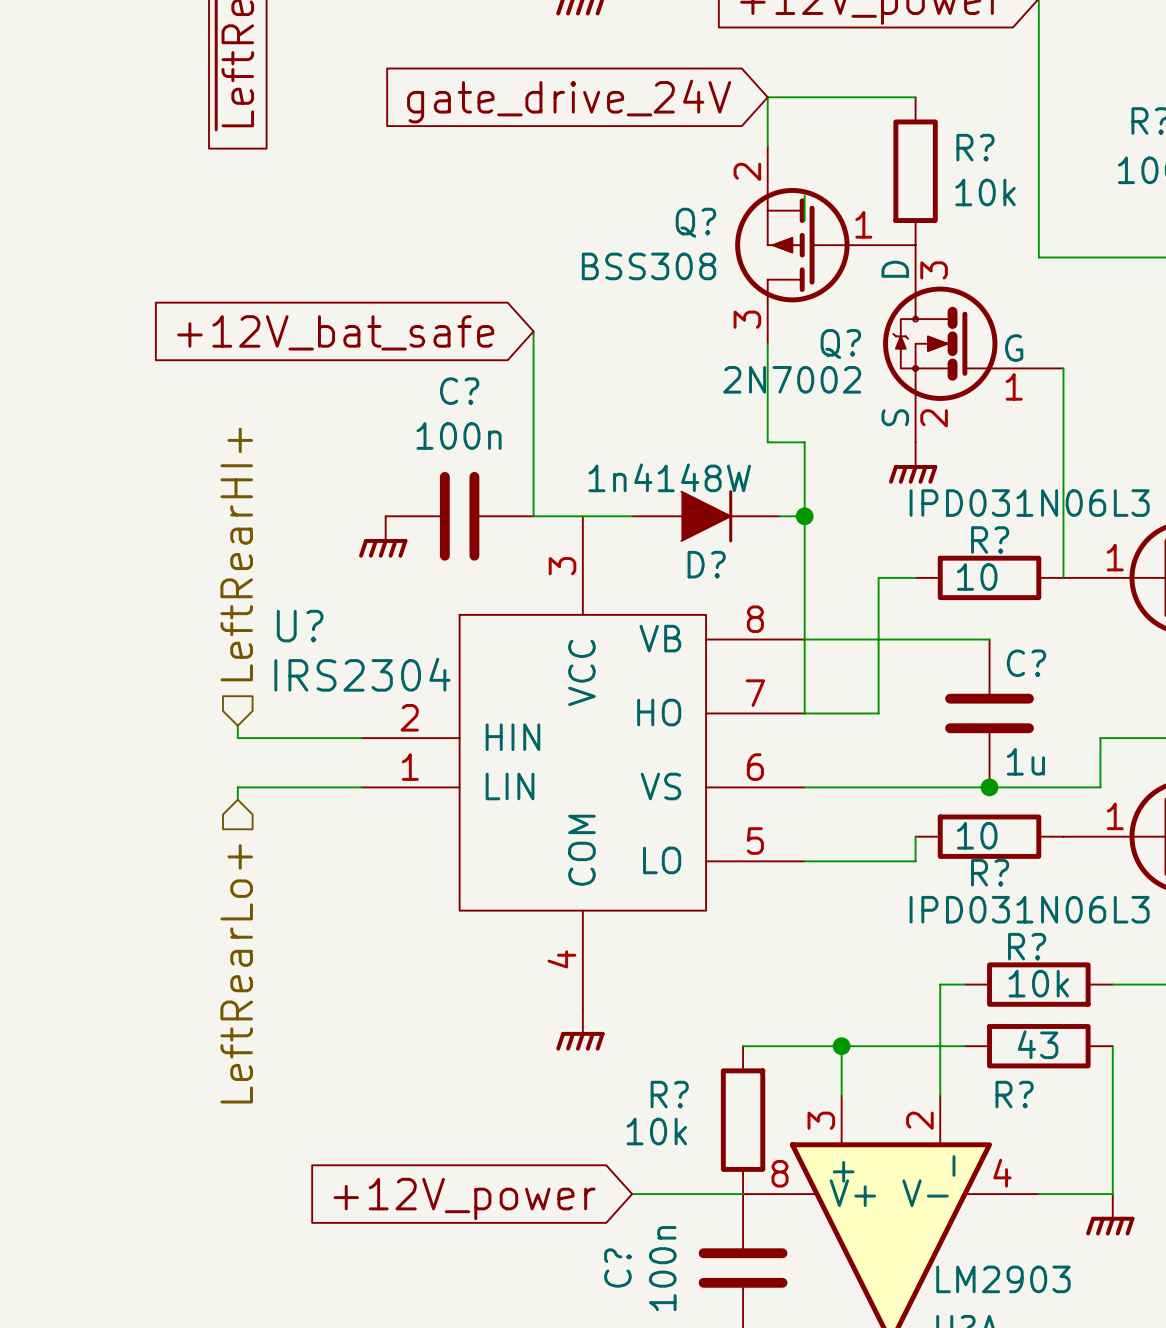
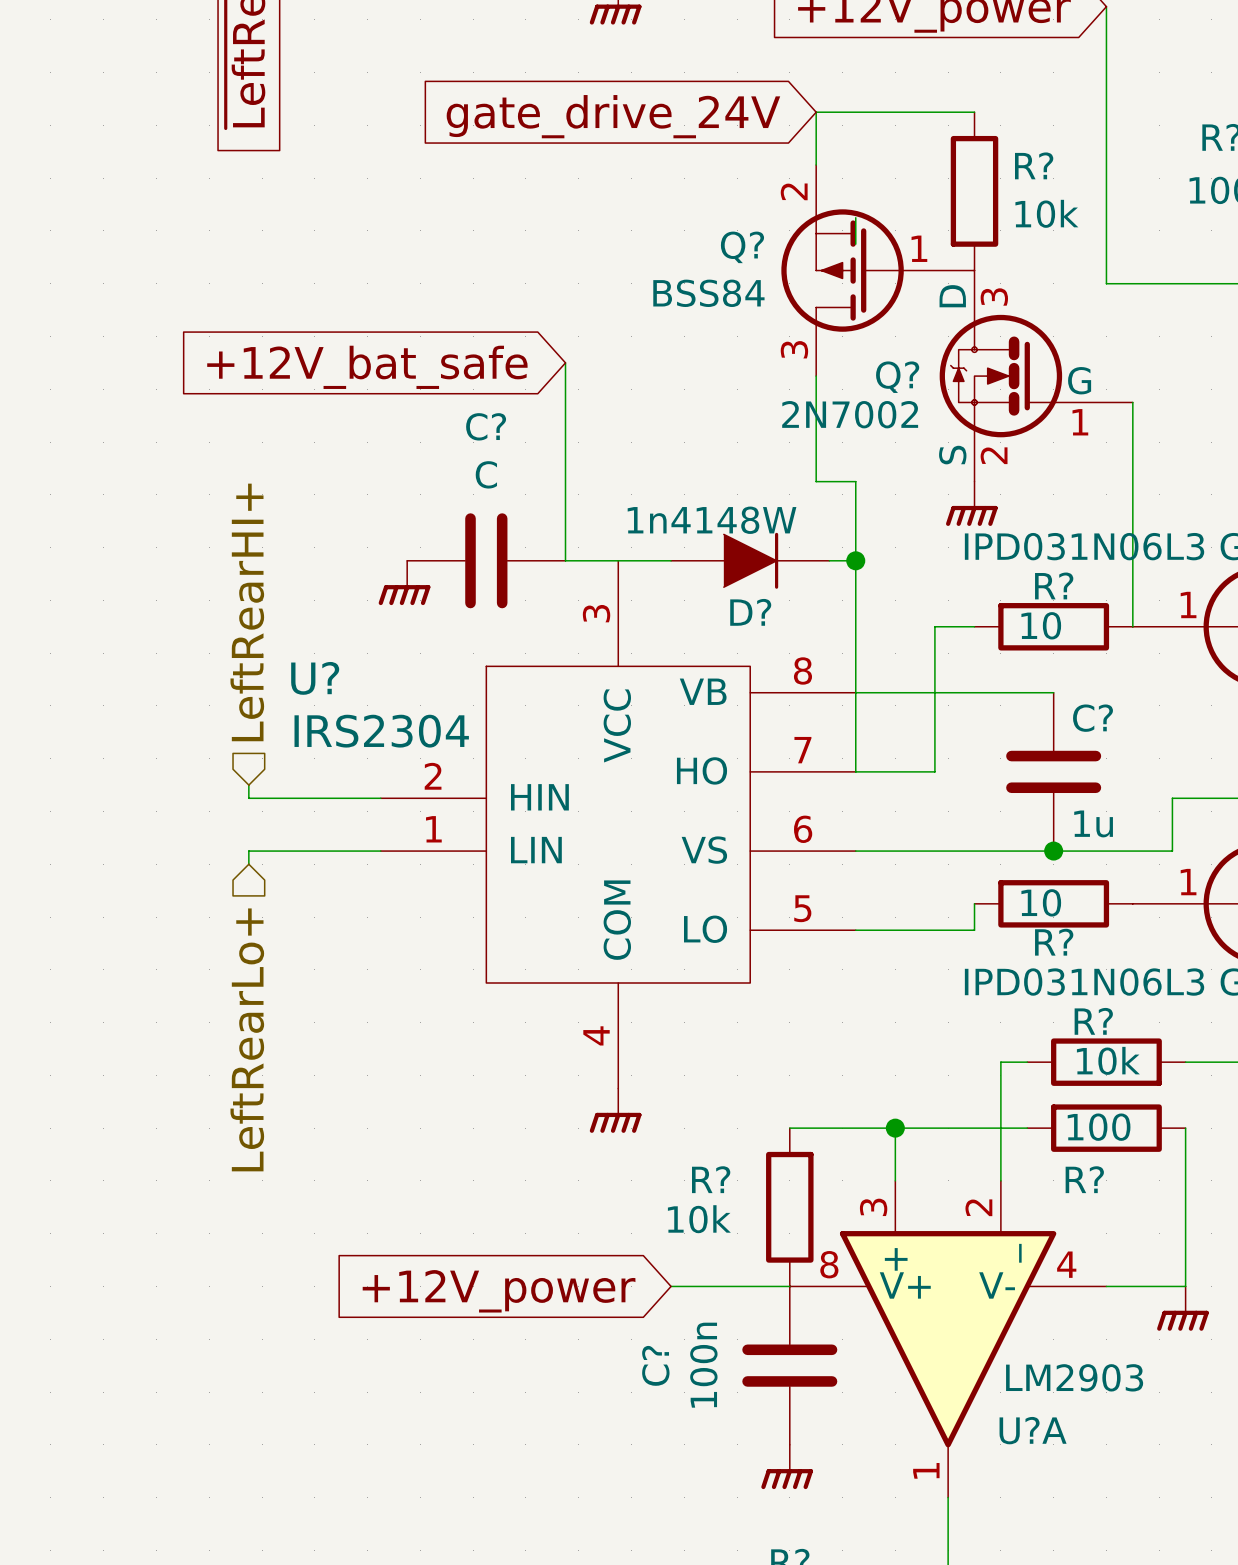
Q? value: BSS308 (649, 266) -> BSS84 (708, 293)
C? value: 100n (459, 436) -> C (486, 474)
R? value: 43 (1038, 1044) -> 100 (1099, 1127)

